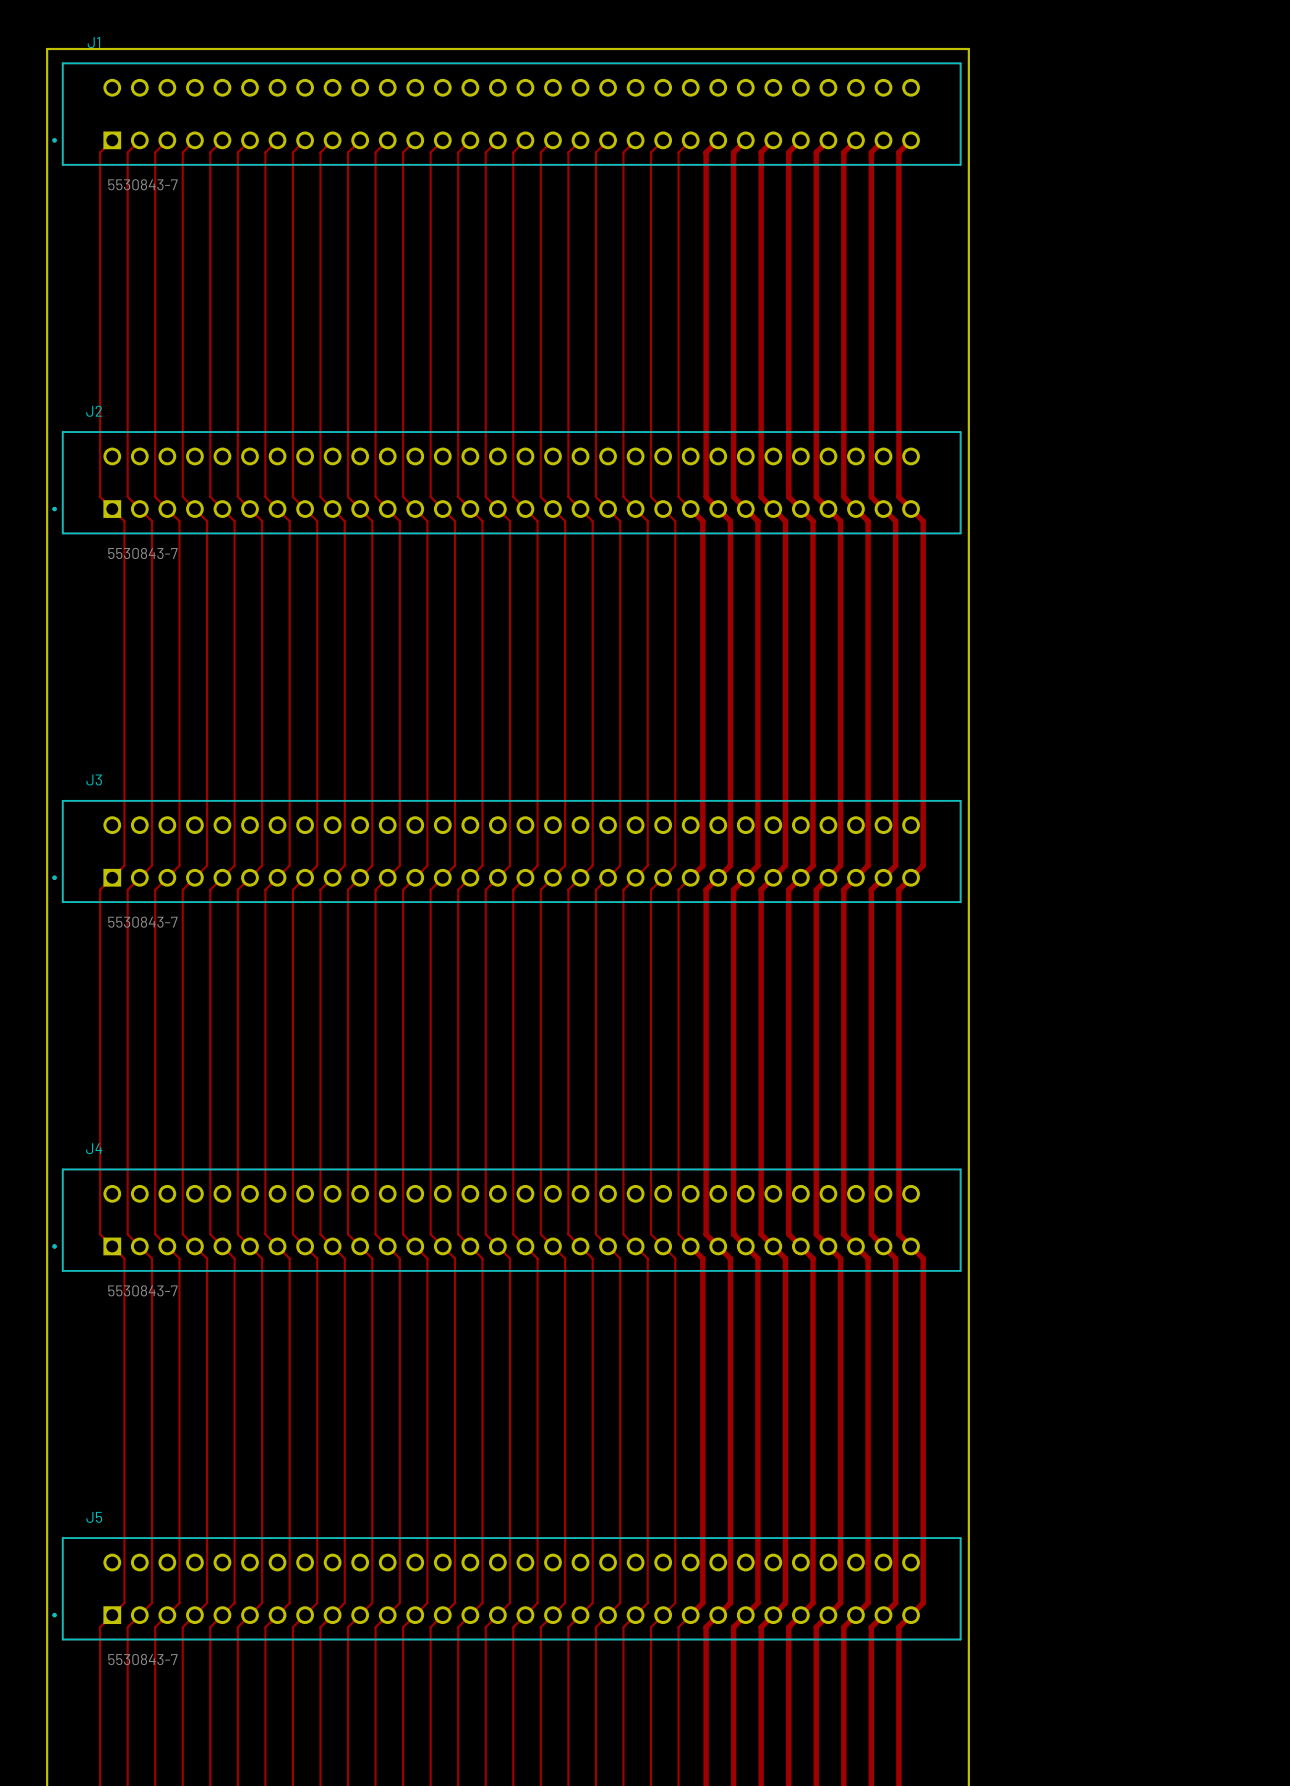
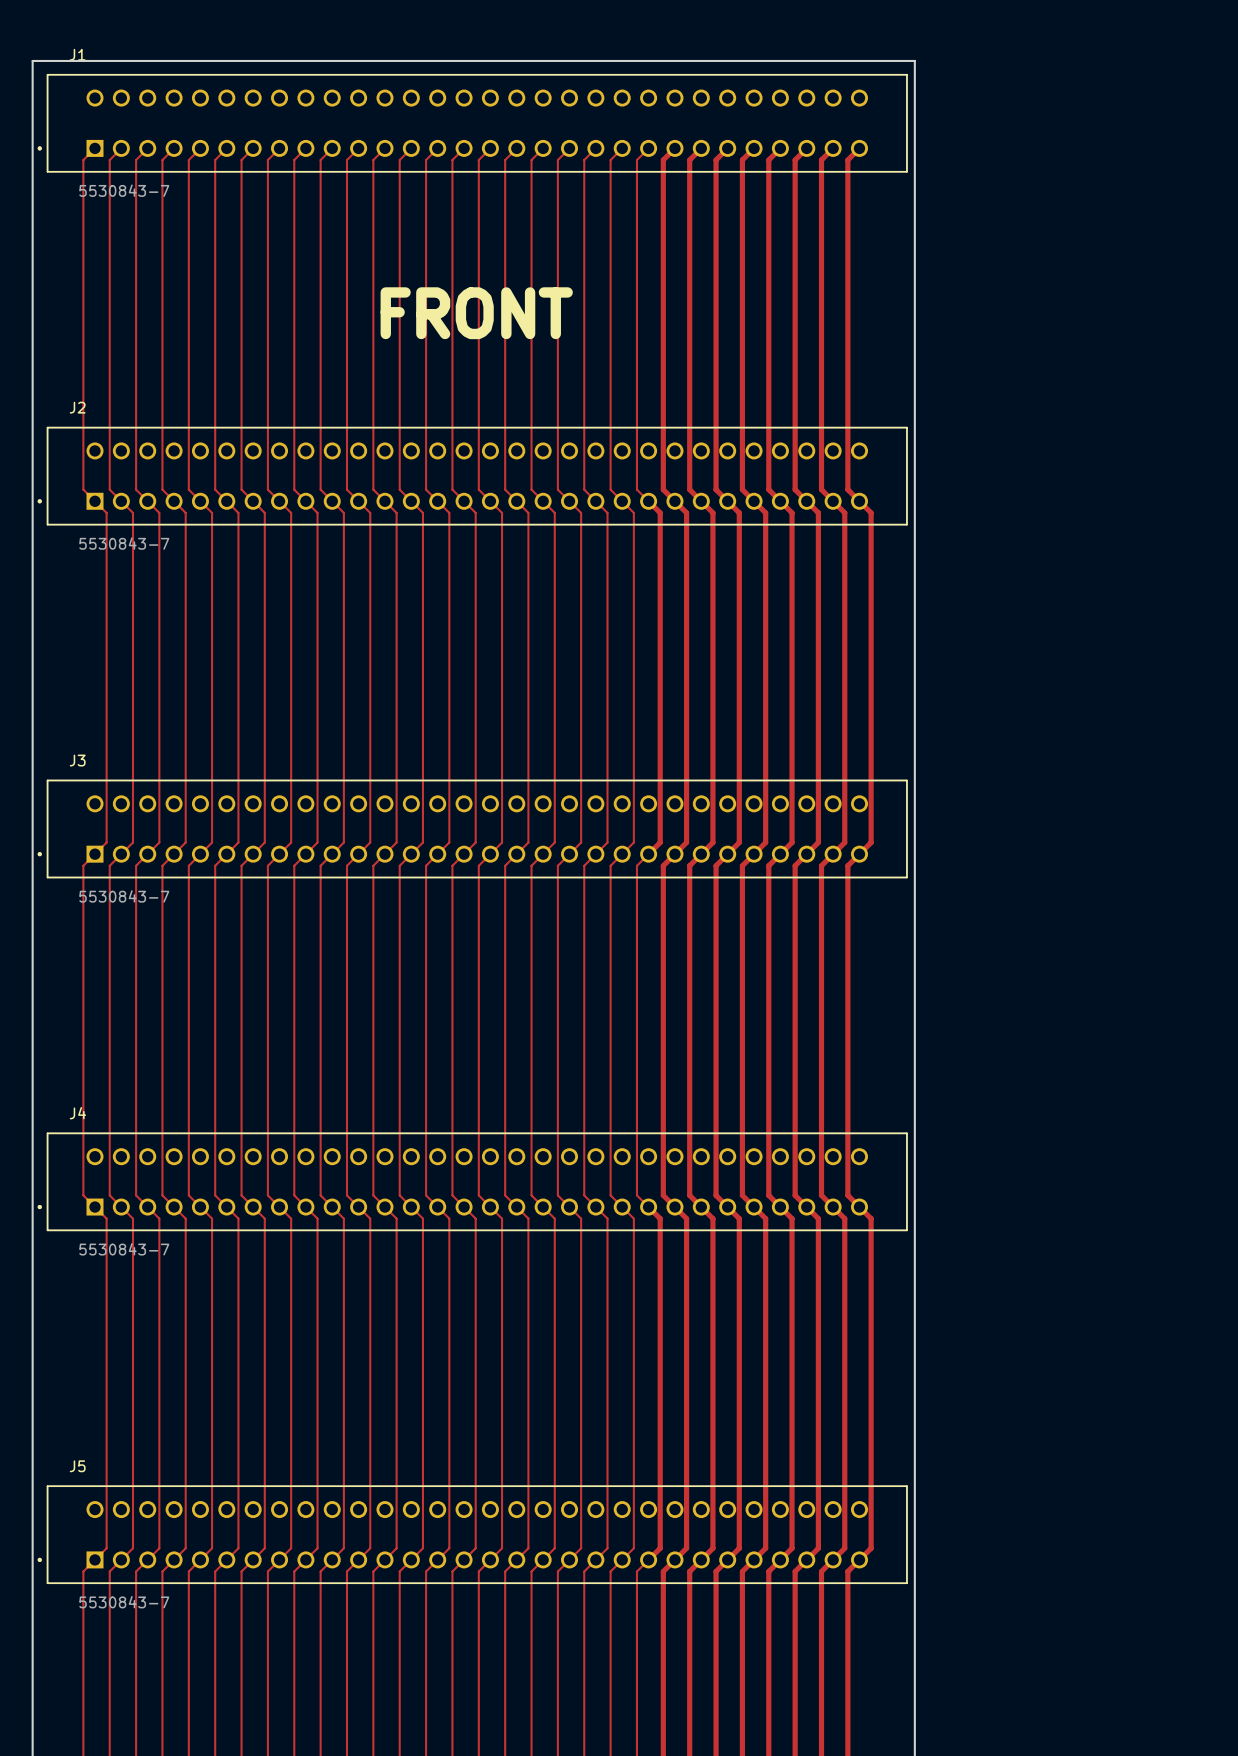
text: none -> FRONT (476, 313)

